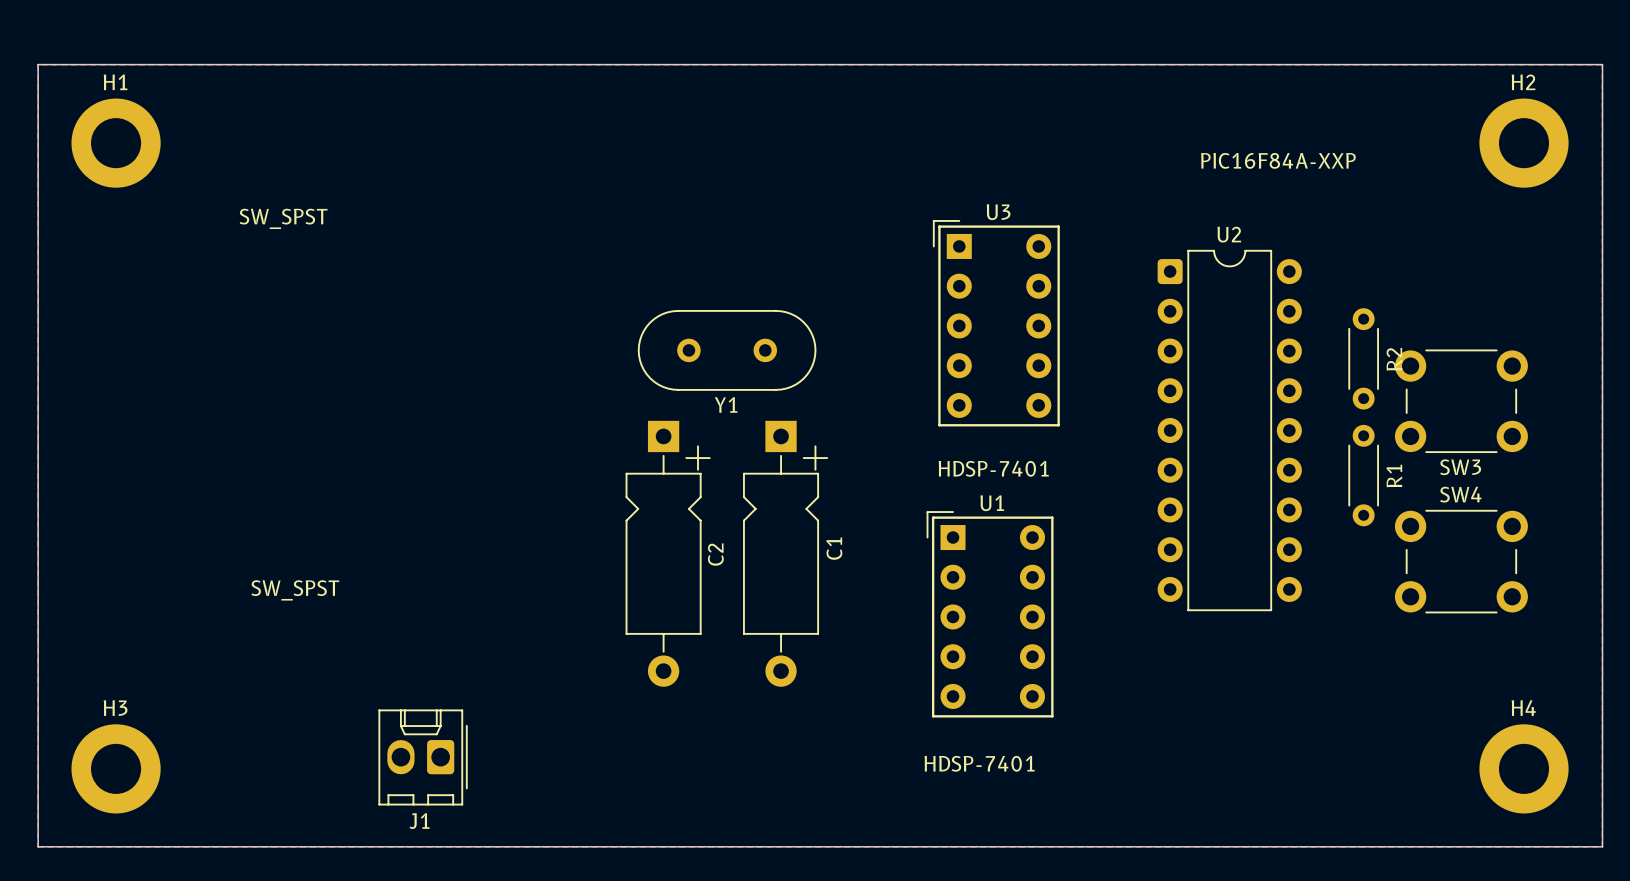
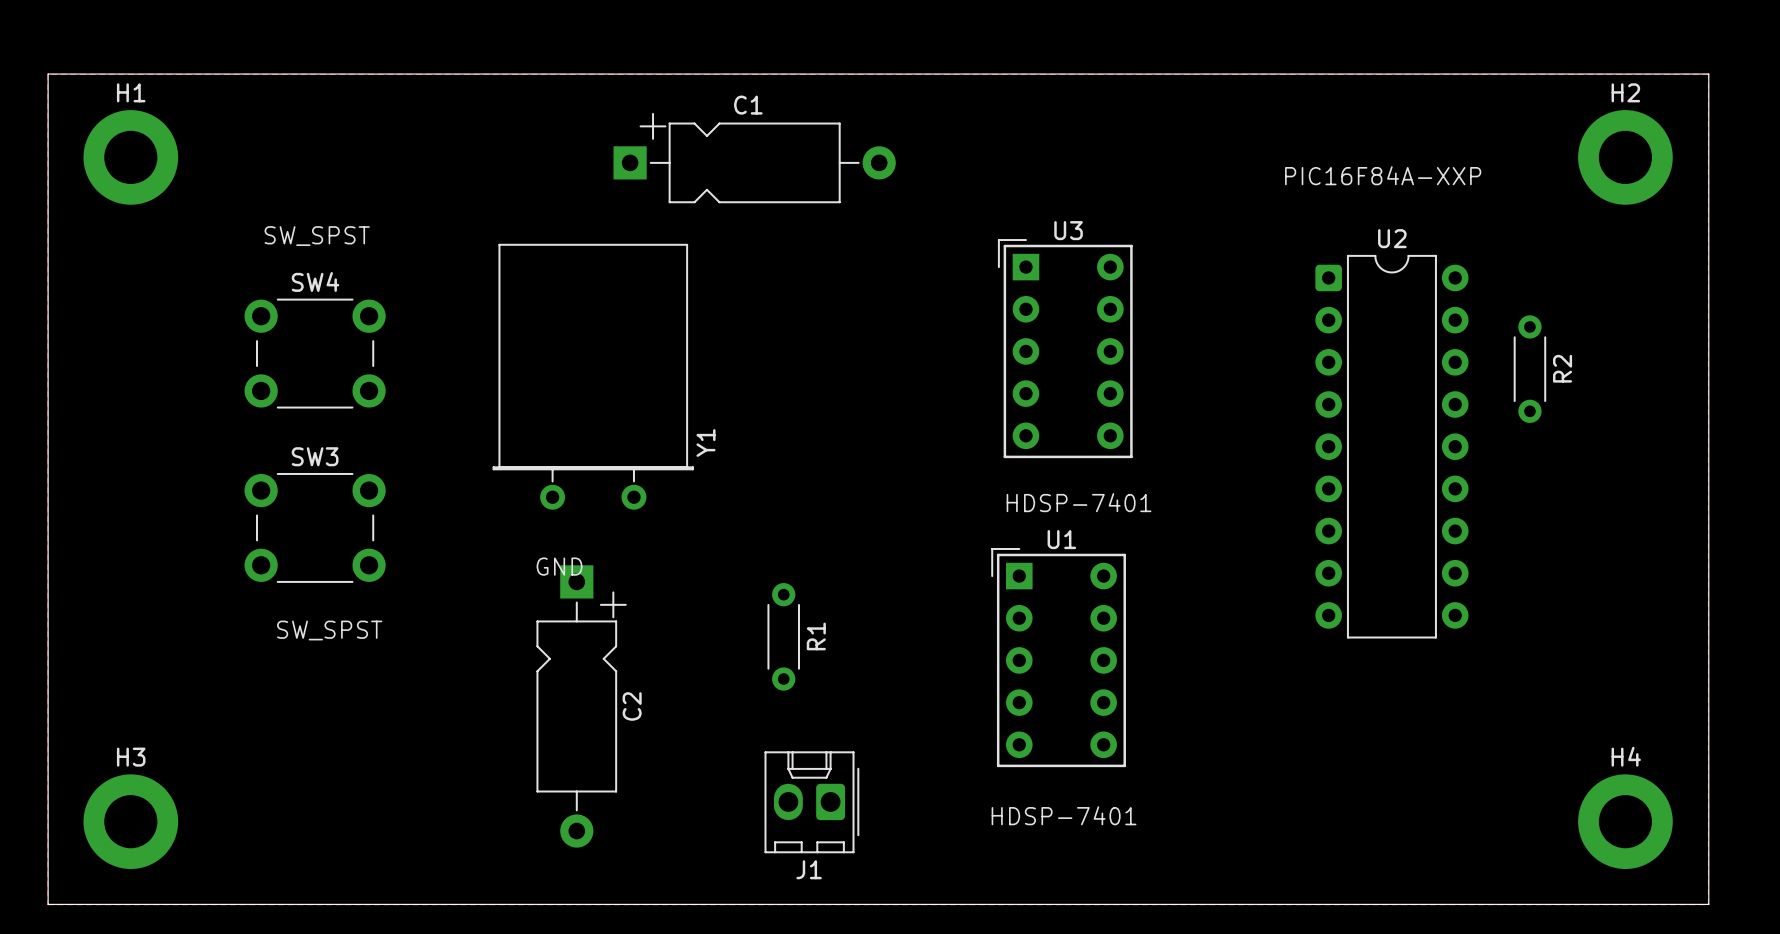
Y1 footprint: [637, 309, 817, 391] -> [492, 243, 694, 510]
R2 position: (1363, 358) -> (1529, 369)
SW3 position: (1461, 401) -> (315, 527)
Y1 name position: Y1 (726, 404) -> Y1 (706, 443)
U2 position: (1229, 430) -> (1391, 446)
SW3 name position: SW3 (1460, 467) -> SW3 (315, 456)
R1 position: (1363, 475) -> (783, 636)
text: none -> GND (559, 566)
C2 position: (668, 553) -> (581, 706)
C1 rotation: 0° (785, 553) -> 90° counterclockwise (754, 158)
C1 position: (785, 553) -> (754, 158)
SW4 position: (1461, 561) -> (315, 353)
J1 position: (423, 757) -> (811, 802)

